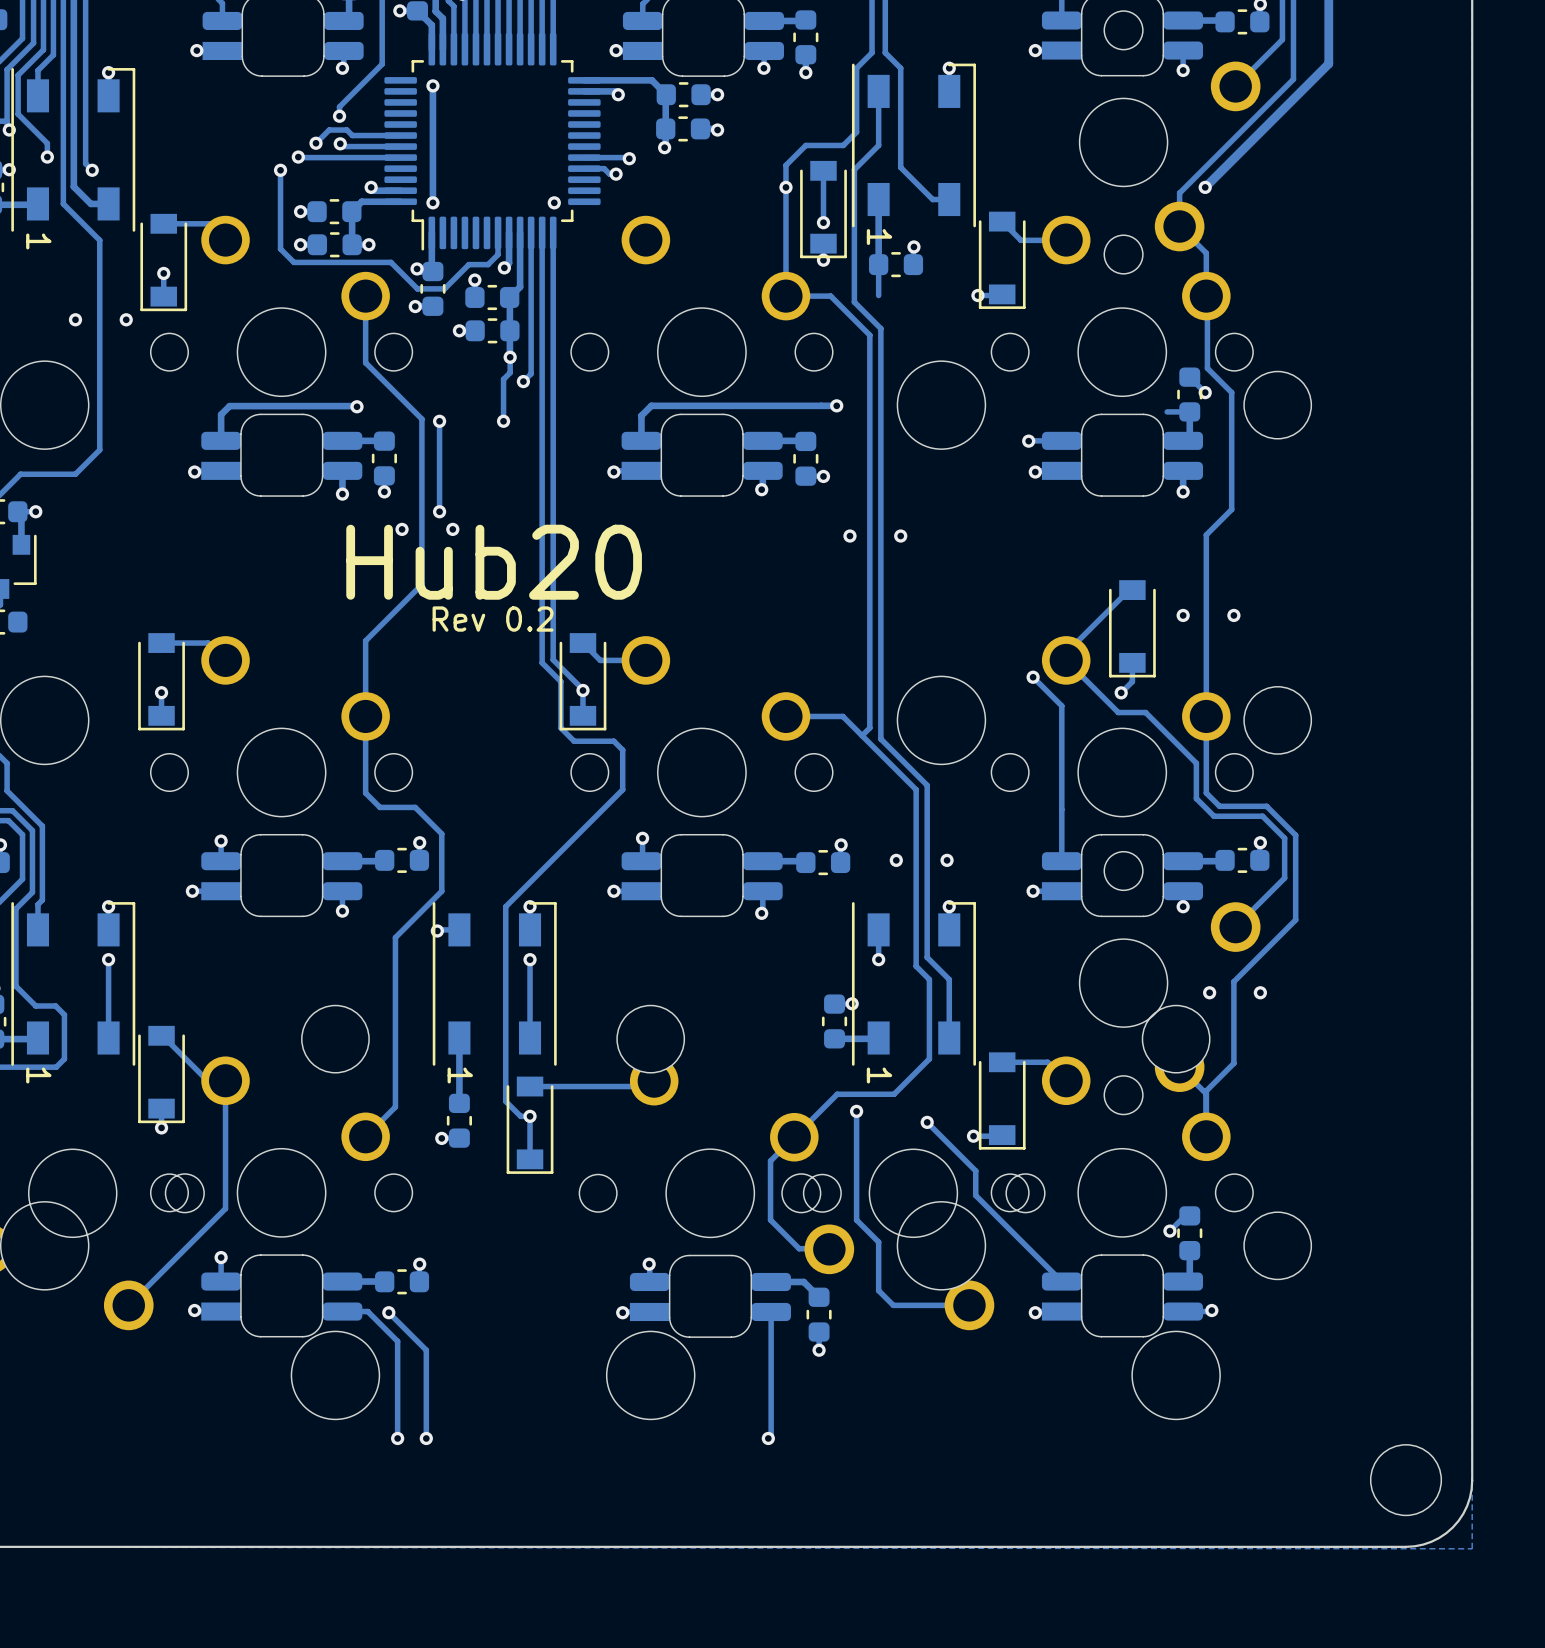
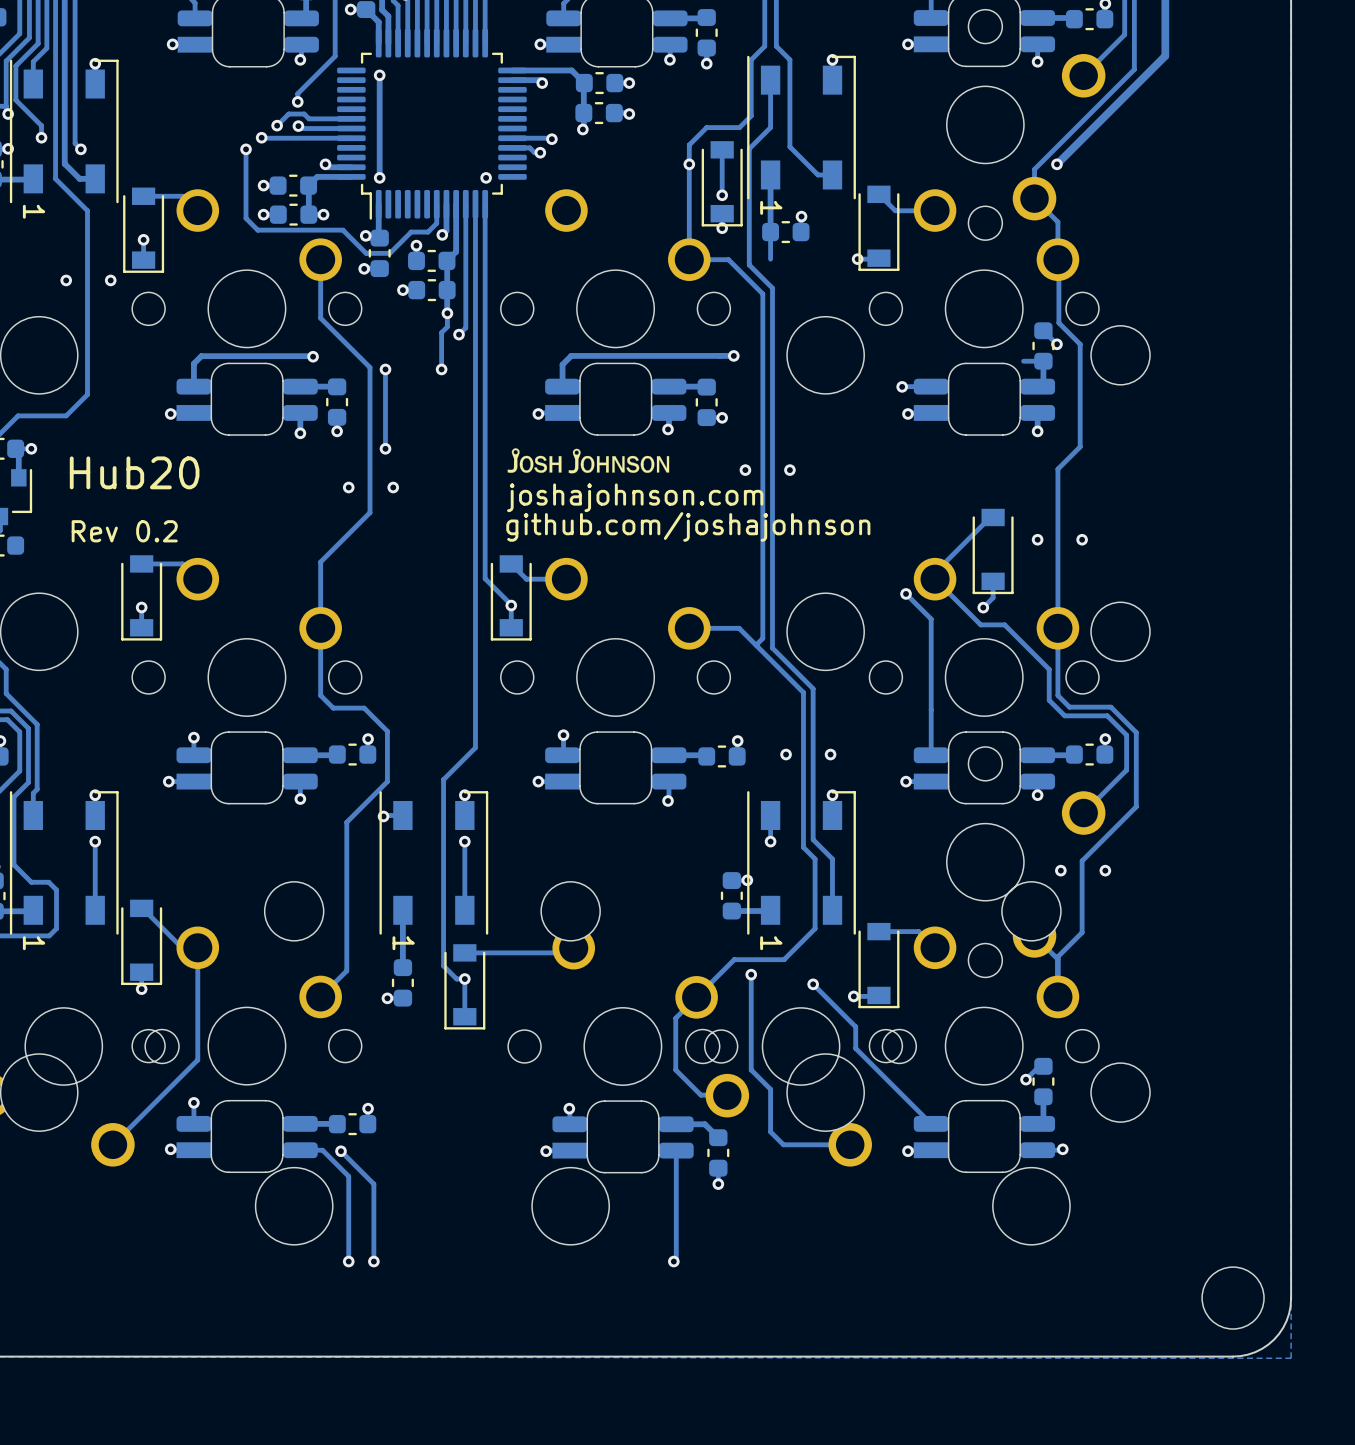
drawing: none -> [507, 448, 670, 474]
drawing: none -> [69, 456, 200, 543]
drawing: [346, 524, 642, 632] -> none
via: (402, 529) -> none
via: (452, 529) -> none
via: none -> (348, 487)
via: none -> (393, 487)
track: (542, 662) (560, 681) (560, 727) (574, 741) (613, 741) (622, 750) (622, 789) (505, 906) -> (475, 581) (475, 747) (443, 779) (443, 795)

